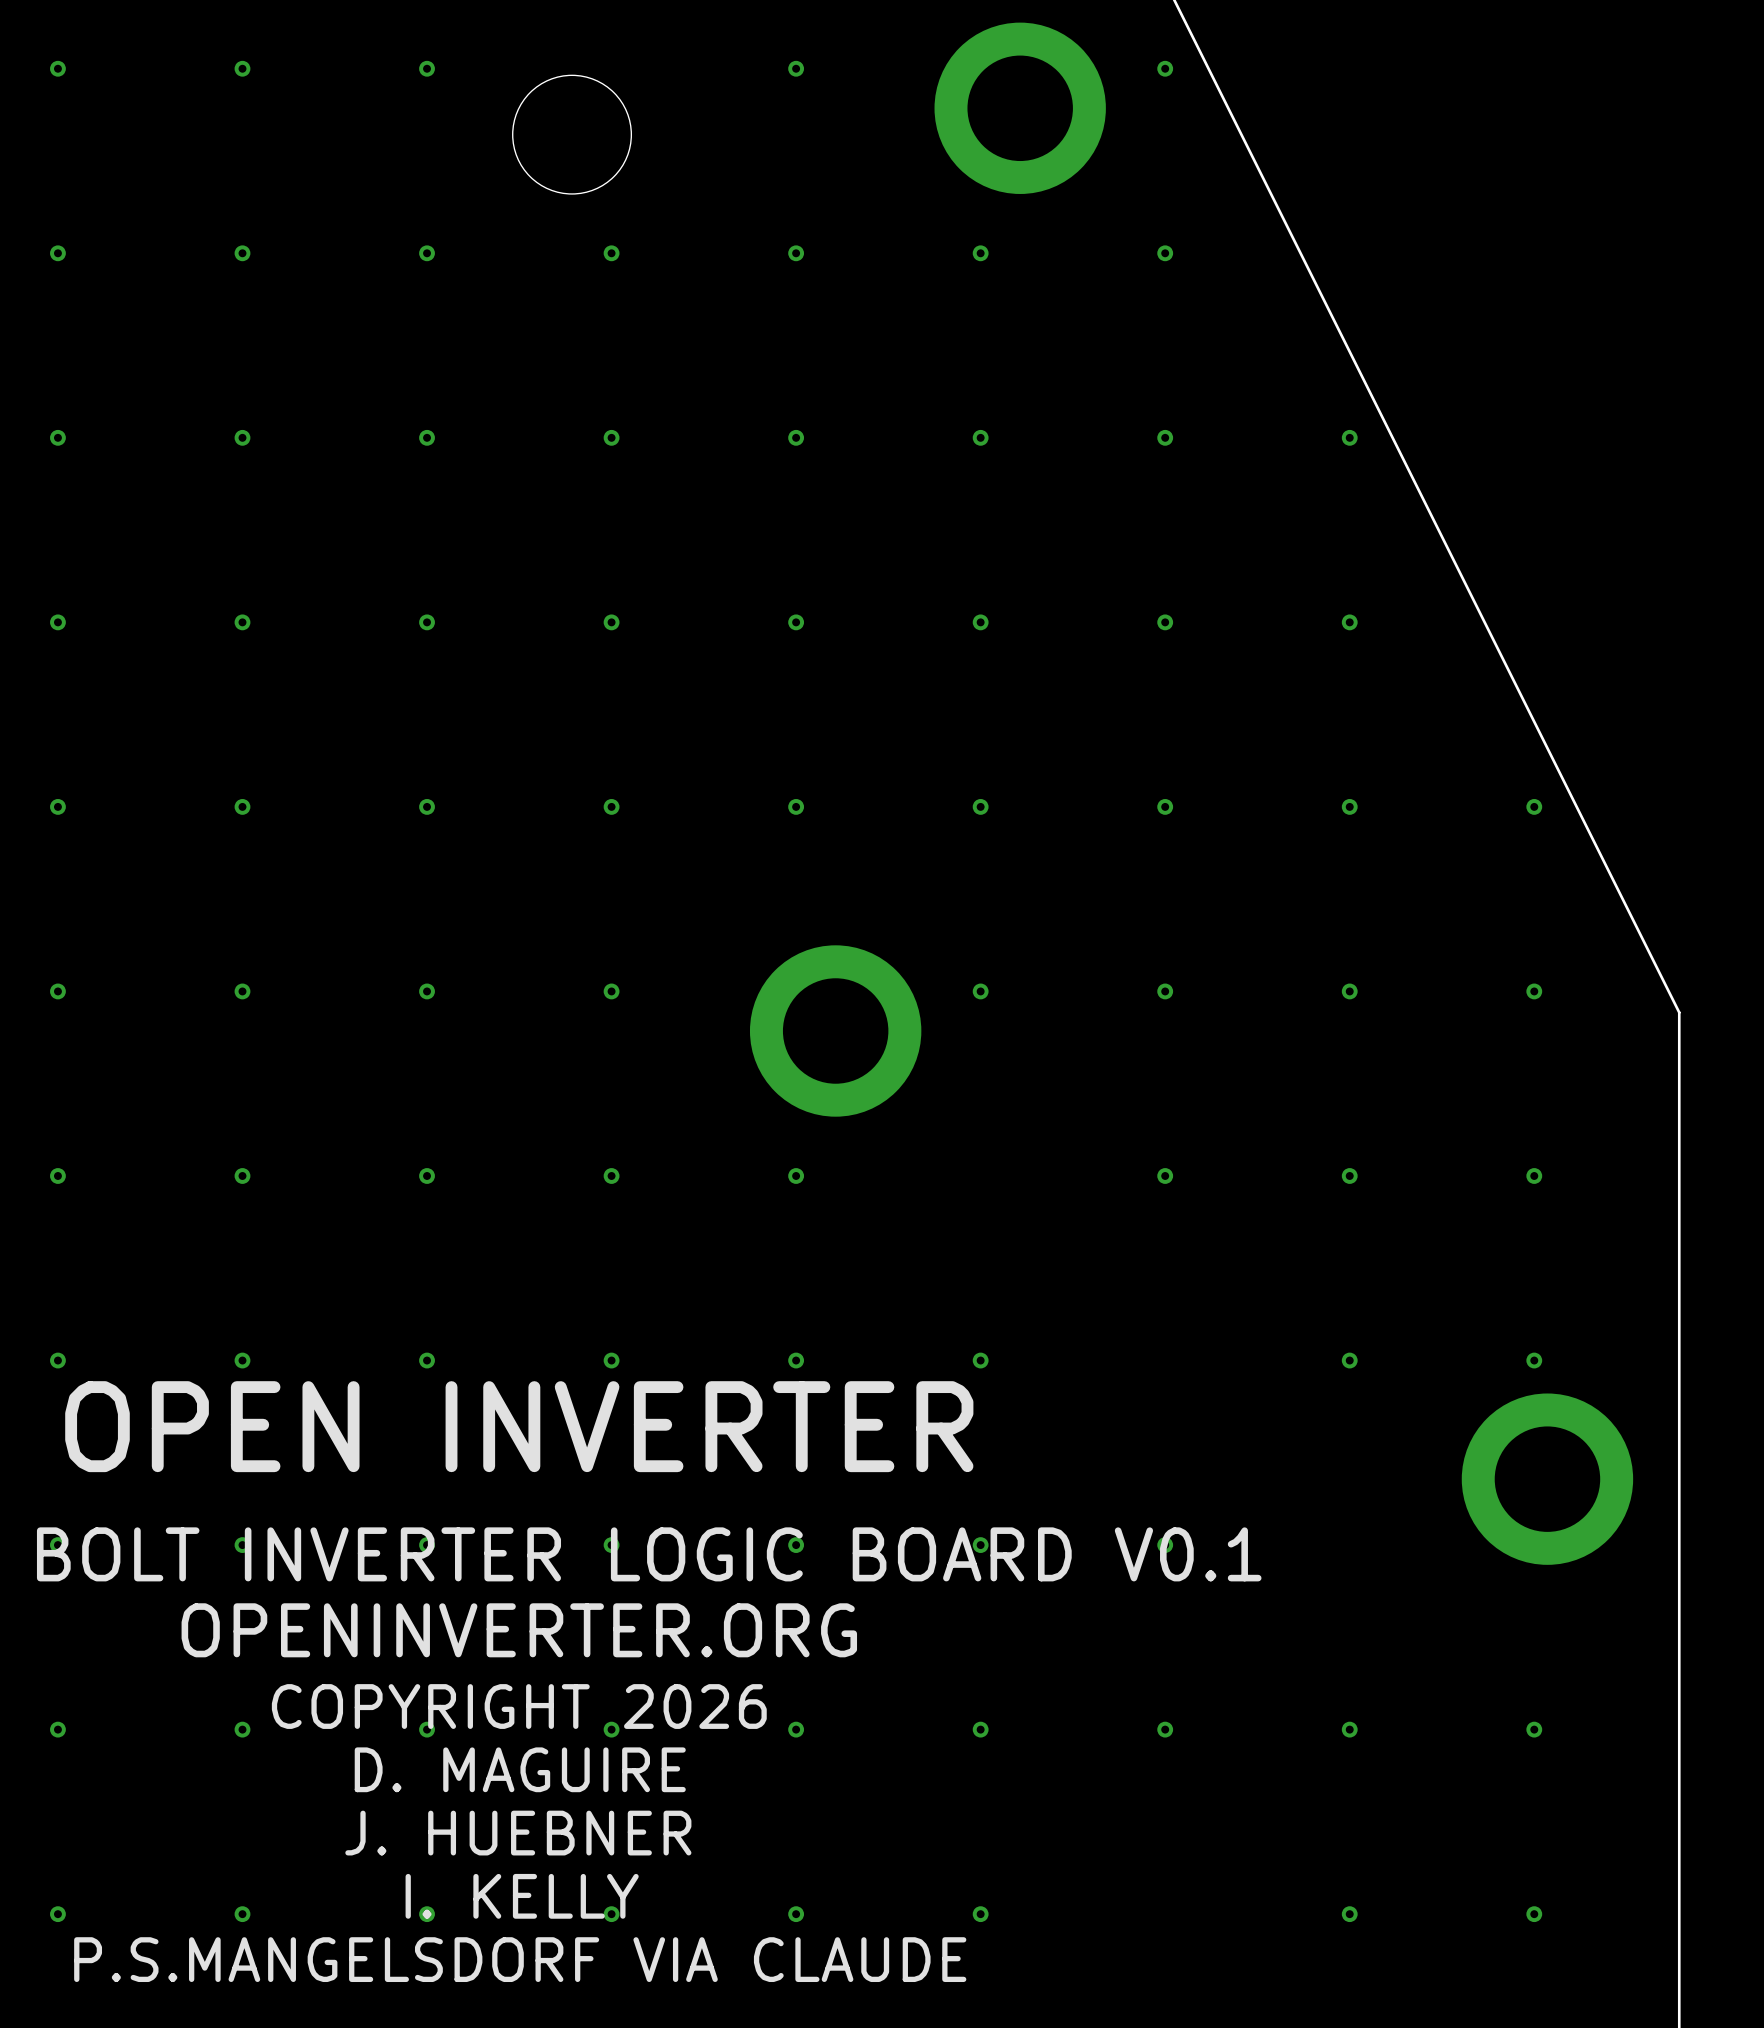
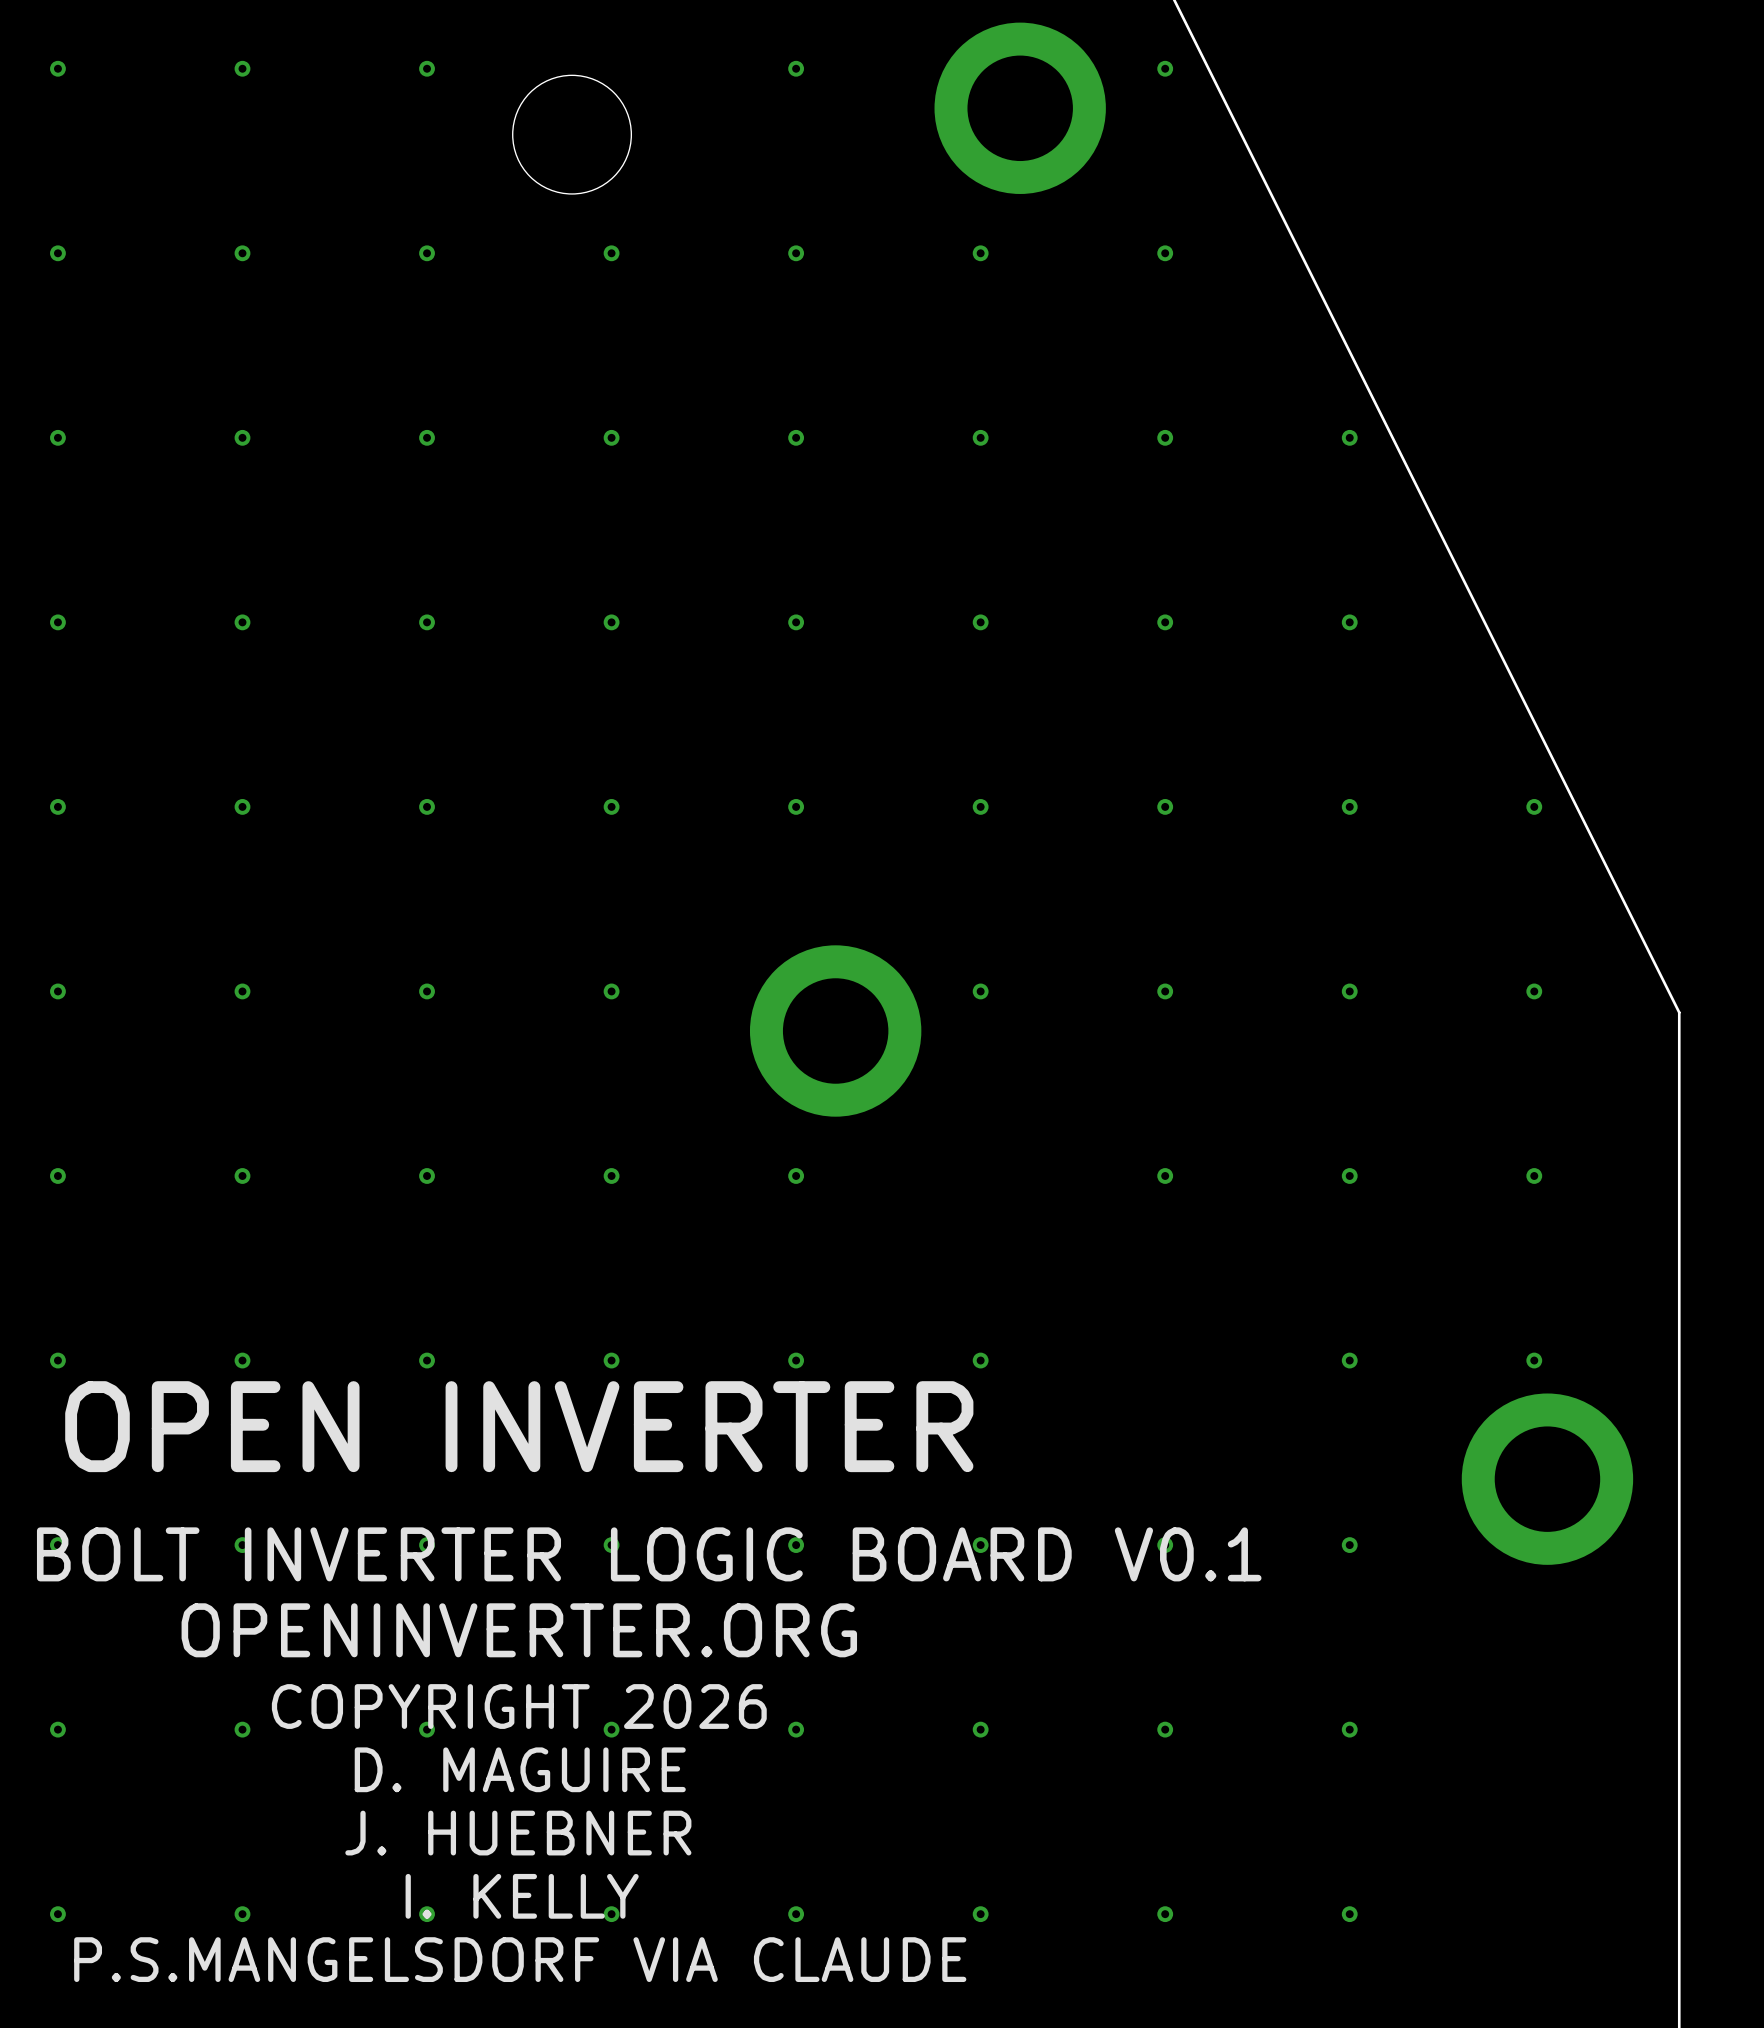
via: none -> (1349, 1545)
via: (1534, 1729) -> none
via: none -> (1165, 1914)
via: (1534, 1914) -> none

